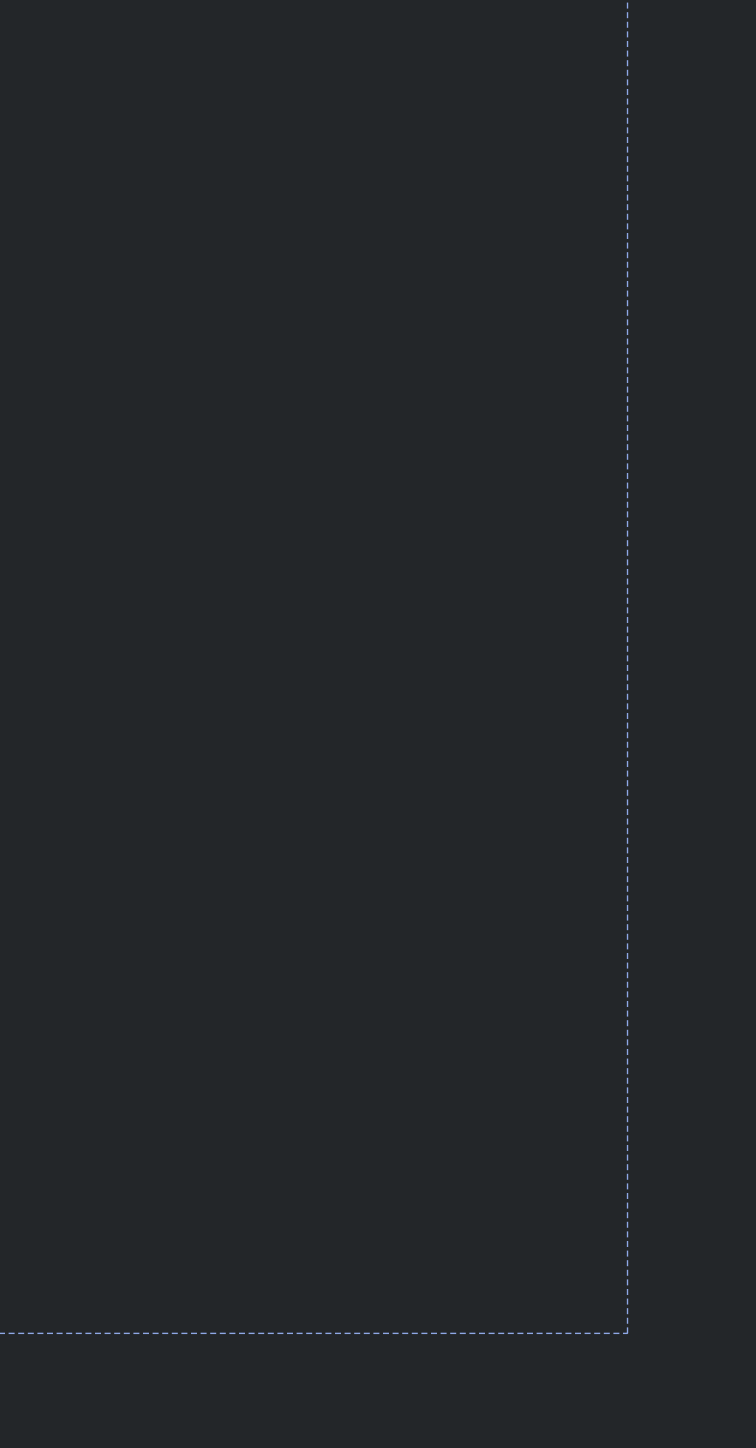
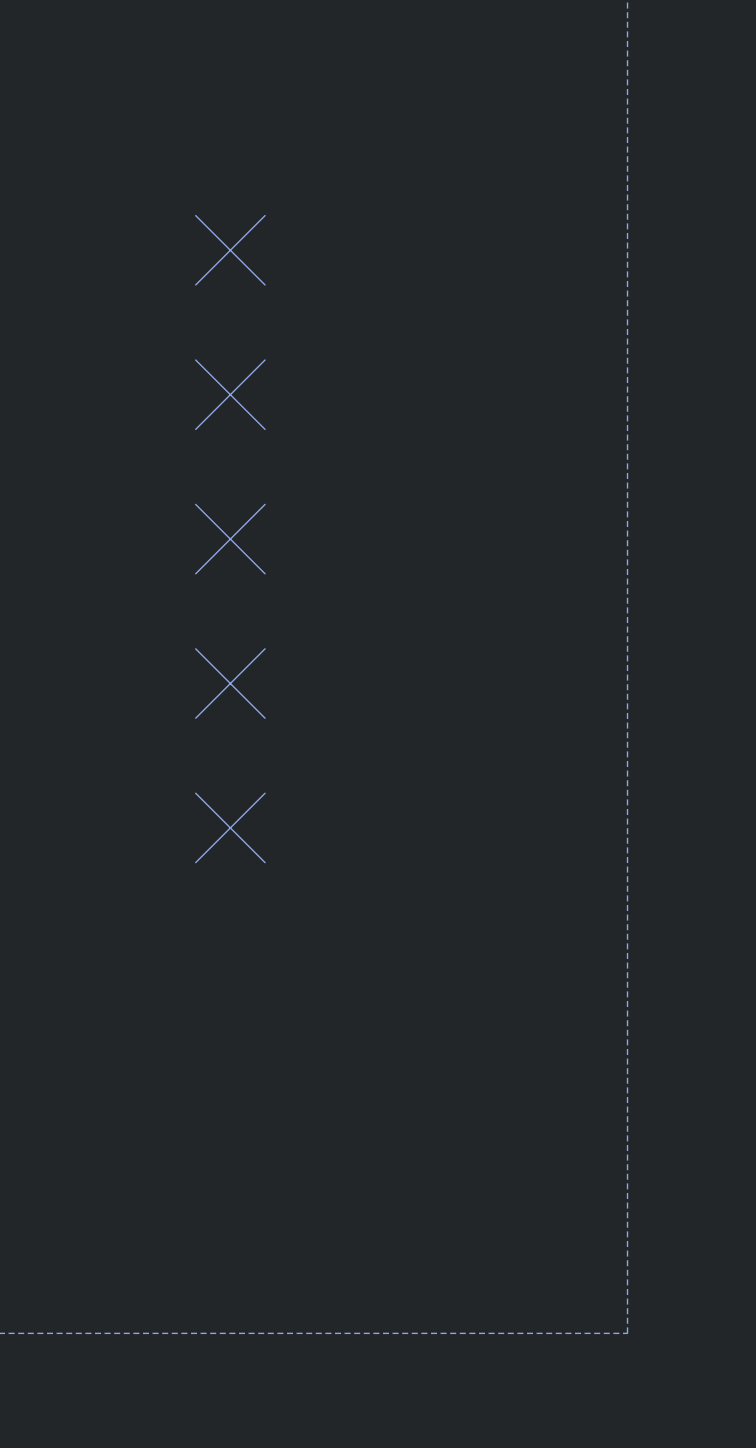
no-connect mark: none -> (230, 250)
no-connect mark: none -> (230, 394)
no-connect mark: none -> (230, 539)
no-connect mark: none -> (230, 683)
no-connect mark: none -> (230, 827)

